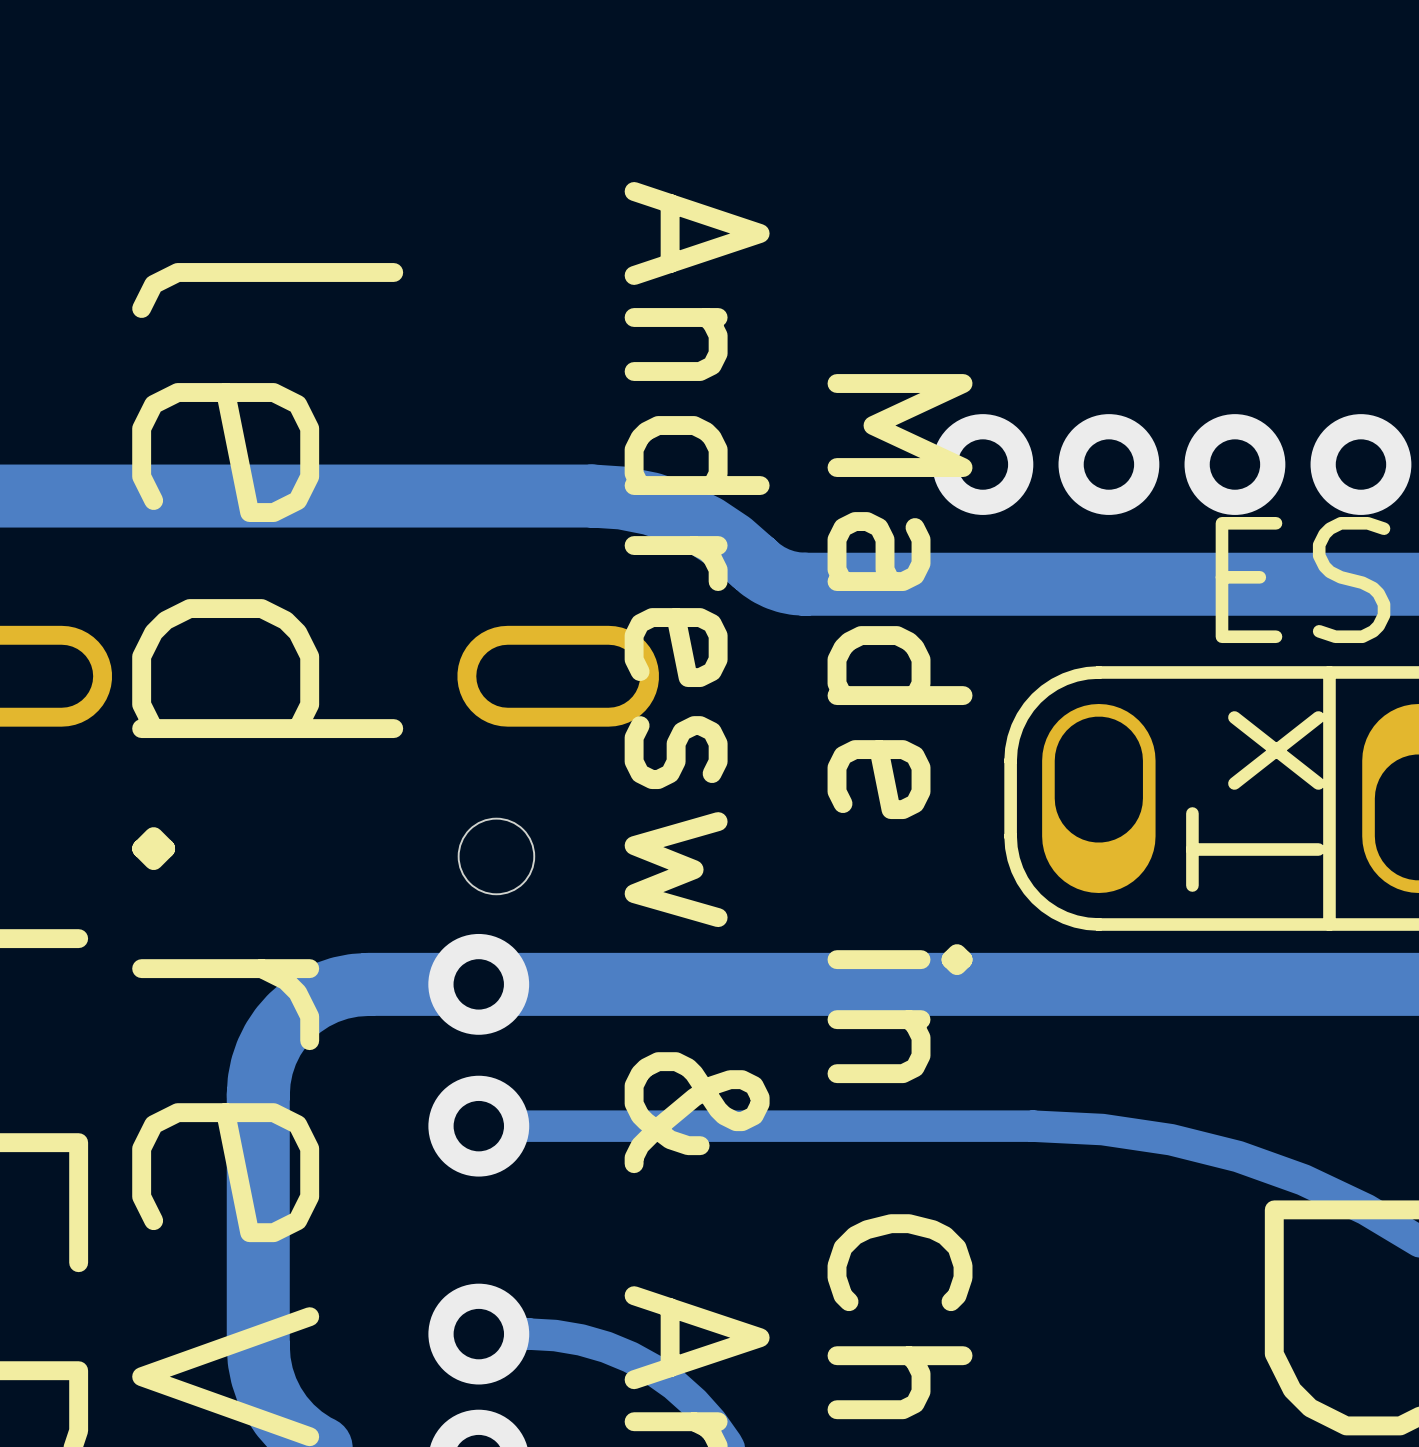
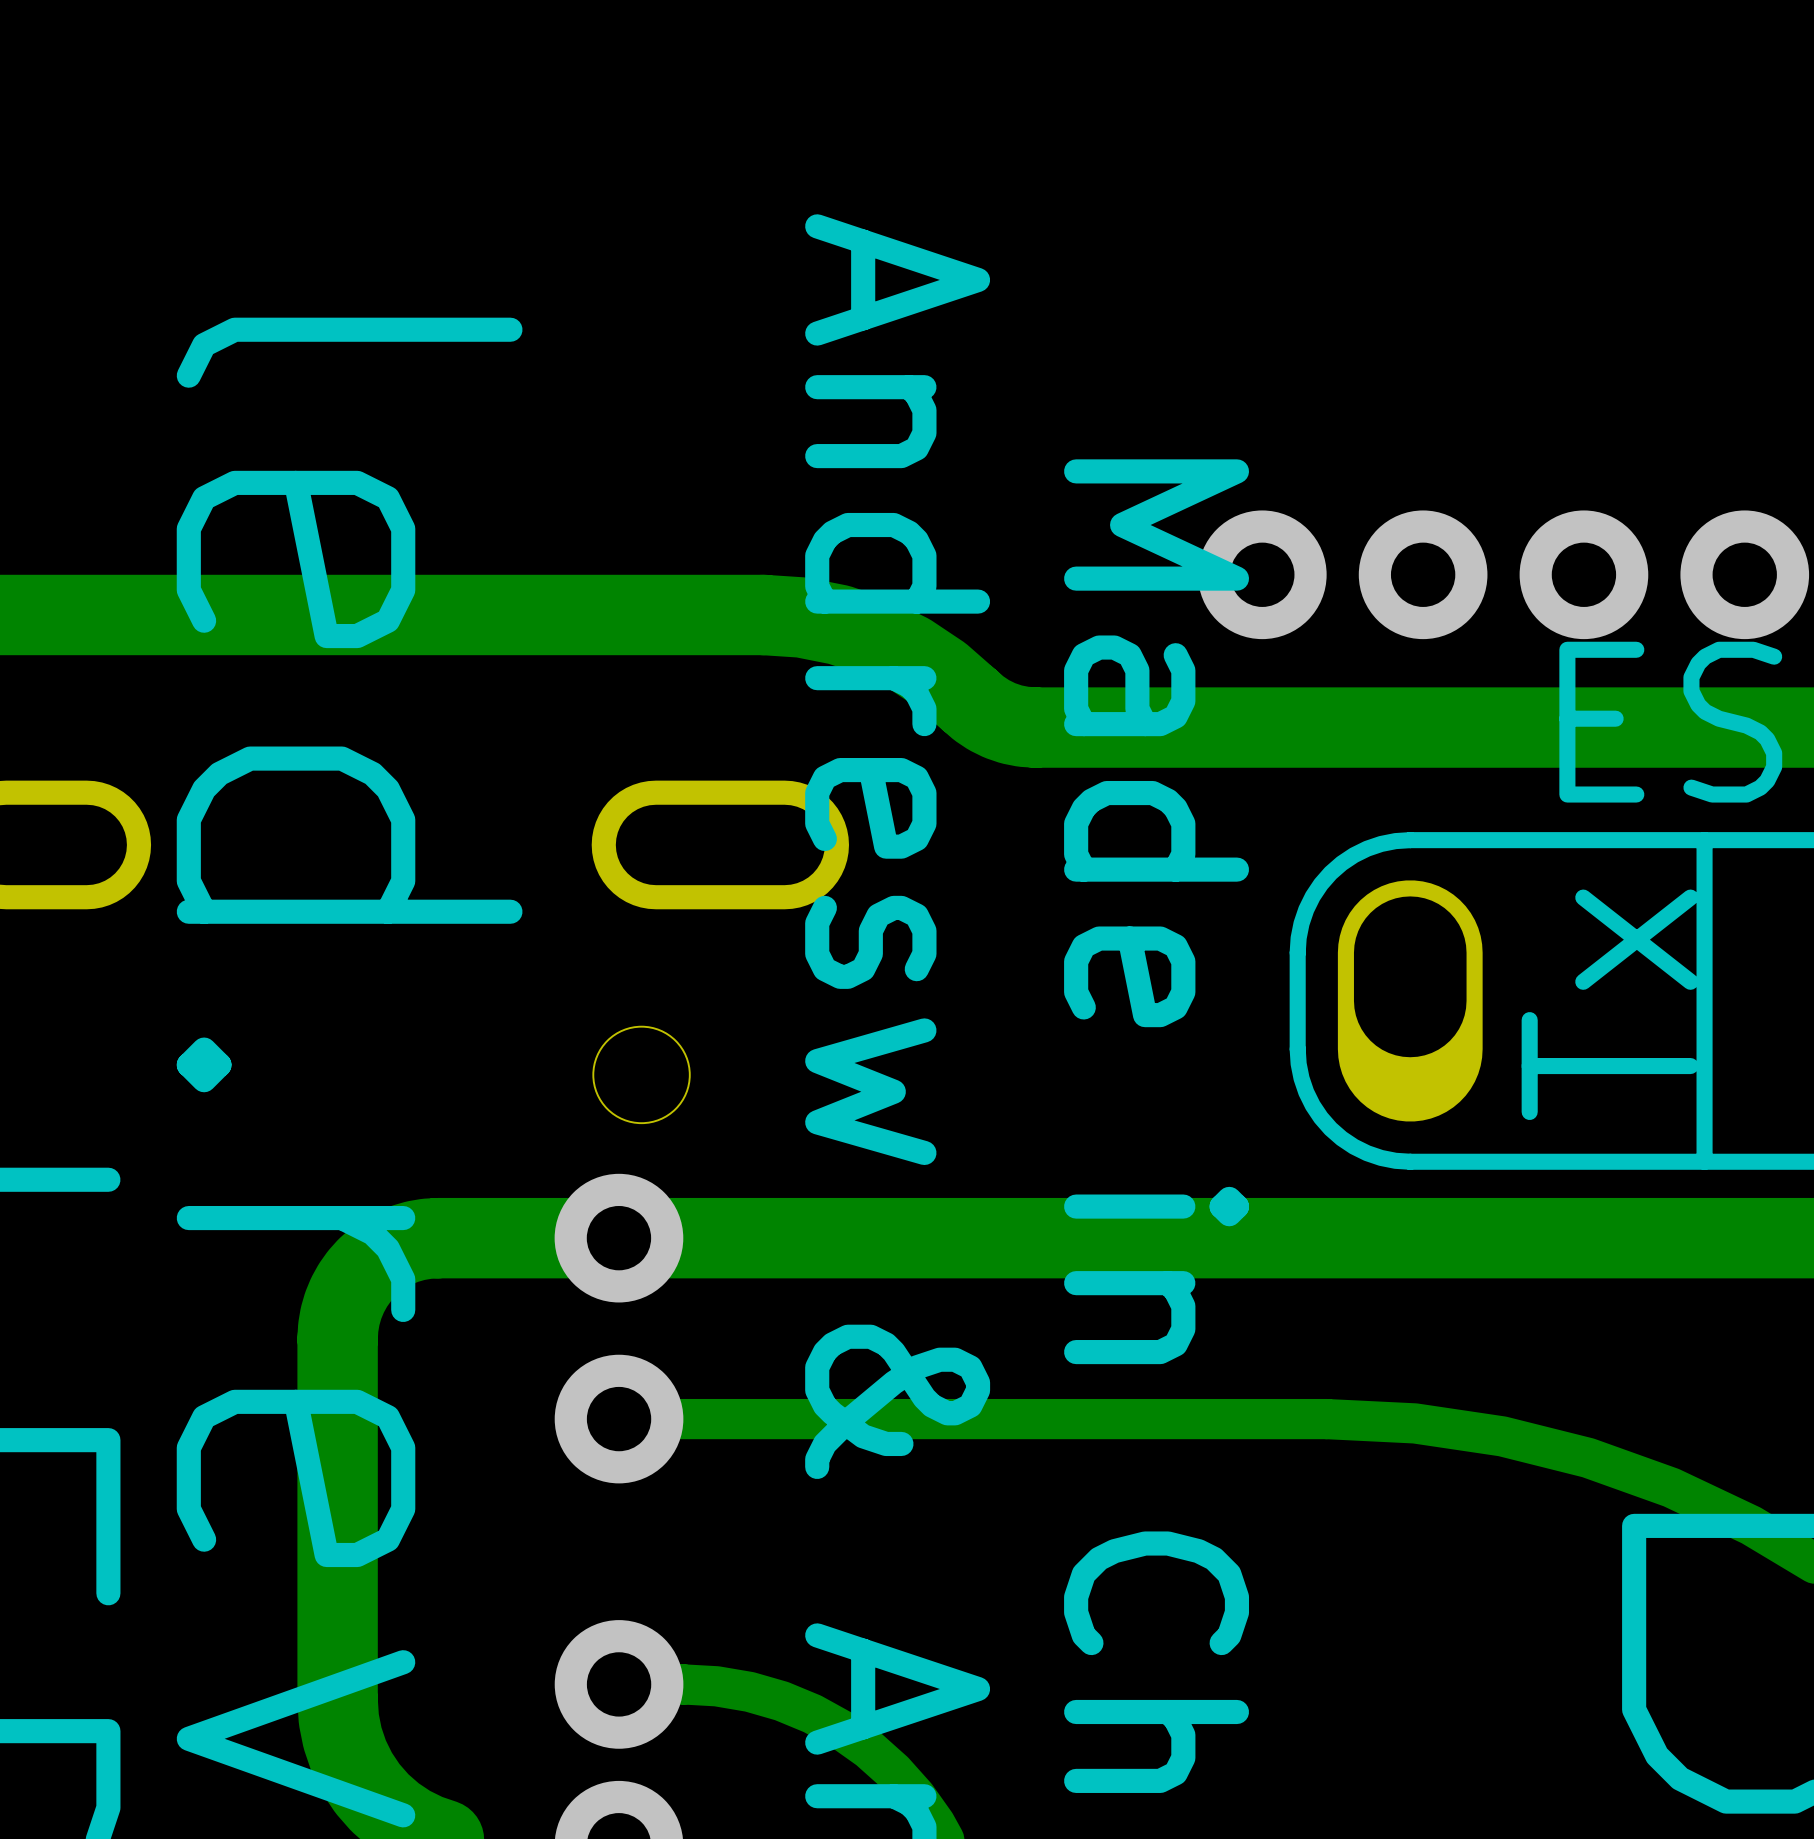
track: (368, 984) (339, 988) (326, 992) (301, 1007) (290, 1016) (281, 1027) (266, 1052) (262, 1066) (258, 1094) -> (478, 1238) (438, 1238) (415, 1240) (384, 1253) (367, 1267) (347, 1295) (340, 1316) (337, 1338) (337, 1378)

